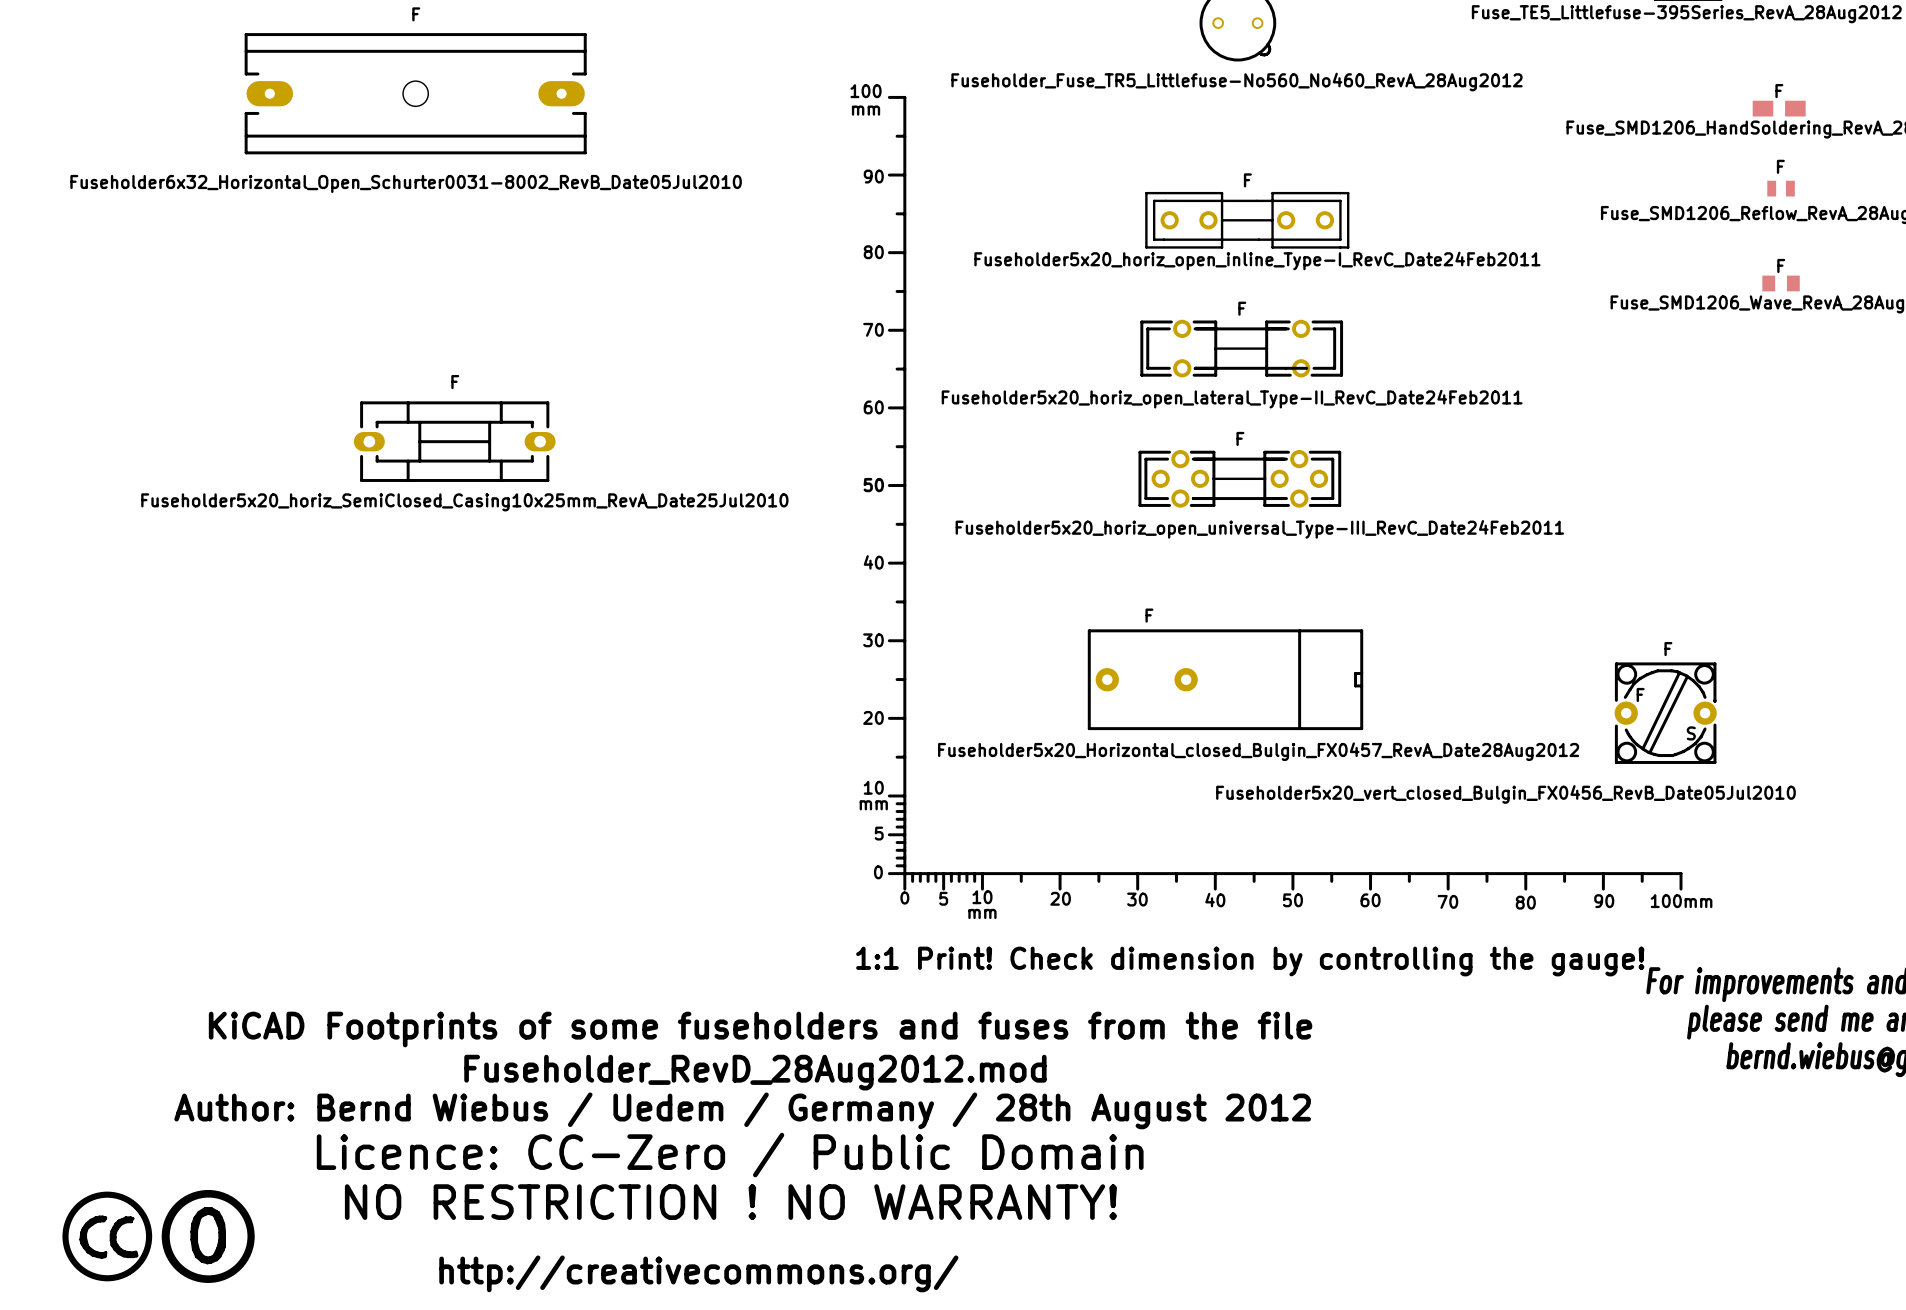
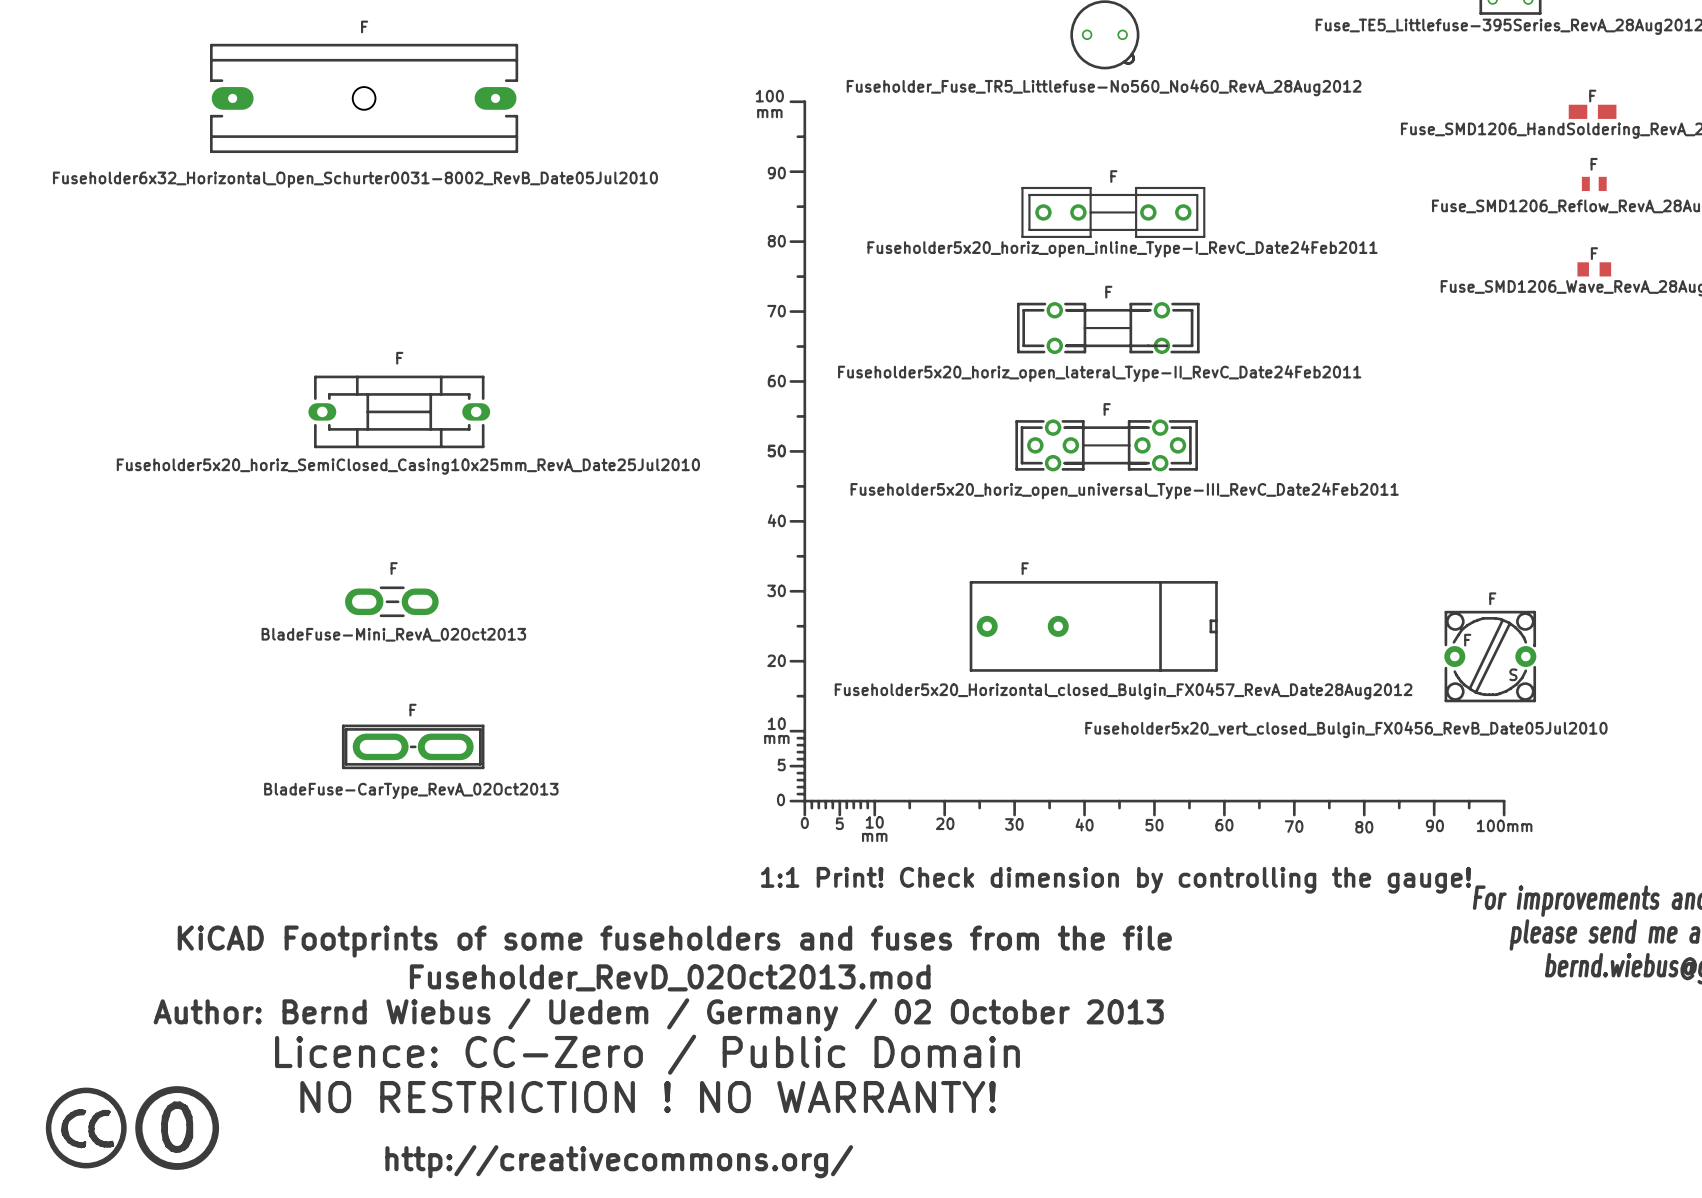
F: none -> BladeFuse-Mini_RevA_02Oct2013 (391, 601)
F: none -> BladeFuse-CarType_RevA_02Oct2013 (413, 746)
text: Fuseholder_RevD_28Aug2012.mod (755, 1072) -> Fuseholder_RevD_02Oct2013.mod (670, 977)
text: Author: Bernd Wiebus / Uedem / Germany / 28th August 2012 (742, 1110) -> Author: Bernd Wiebus / Uedem / Germany / 02 October 2013 (658, 1014)

